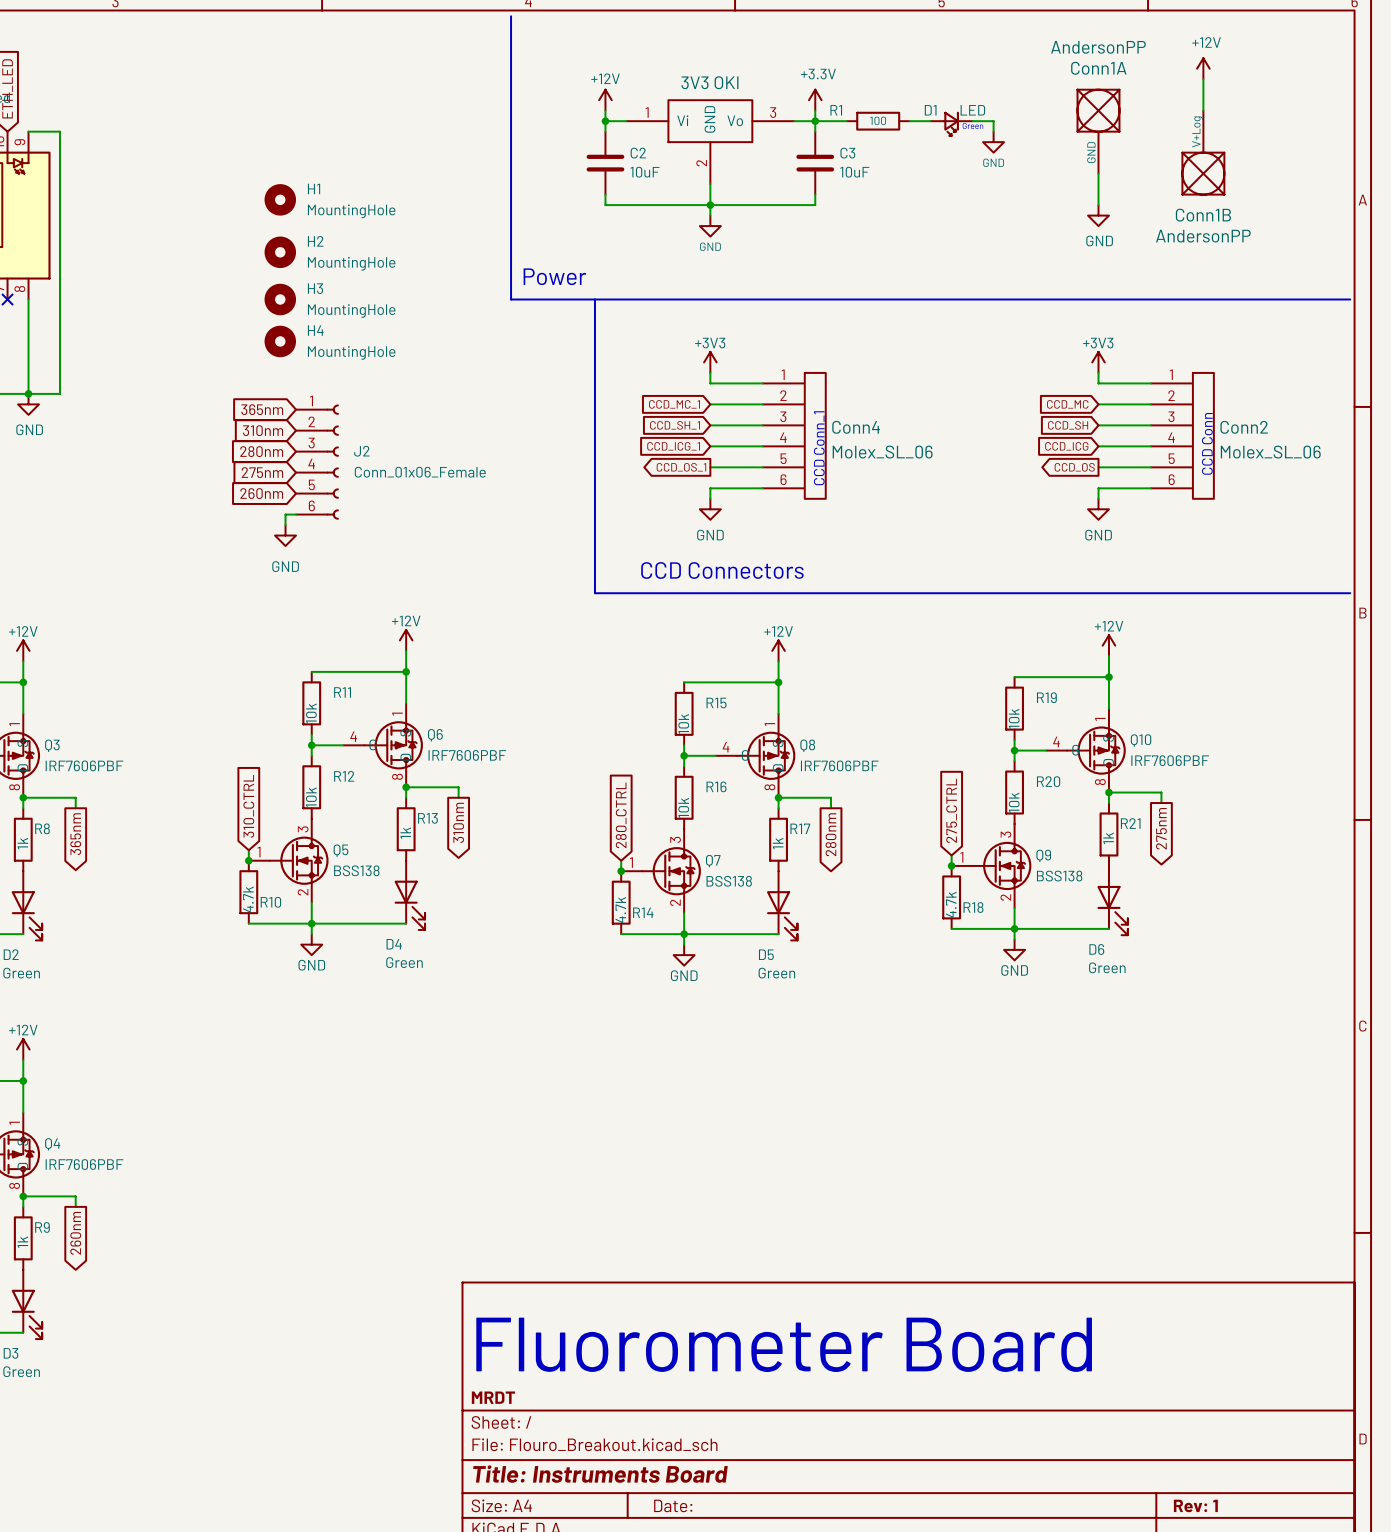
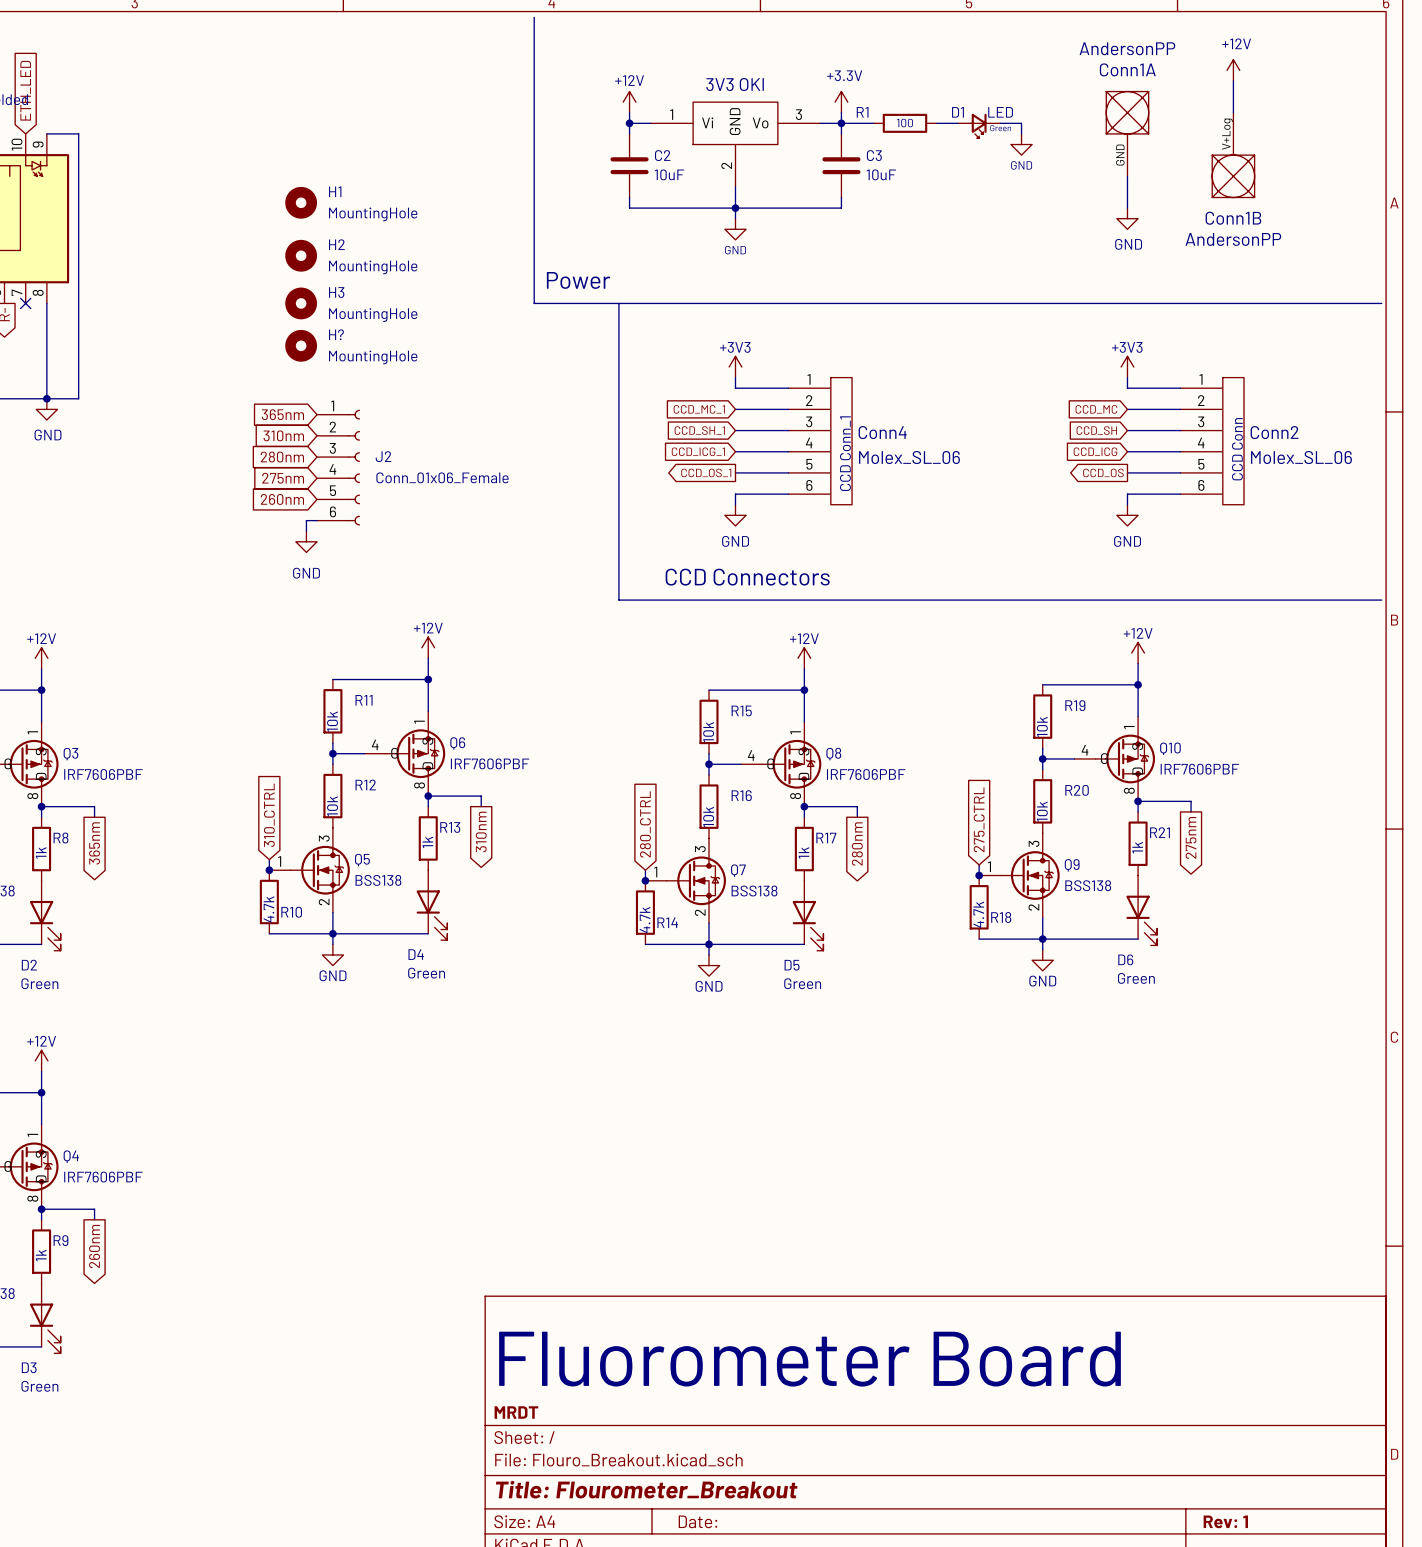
H4 name: H4 (315, 330) -> H? (336, 334)
title block: Title: Instruments Board (600, 1474) -> Title: Flourometer_Breakout (646, 1489)

